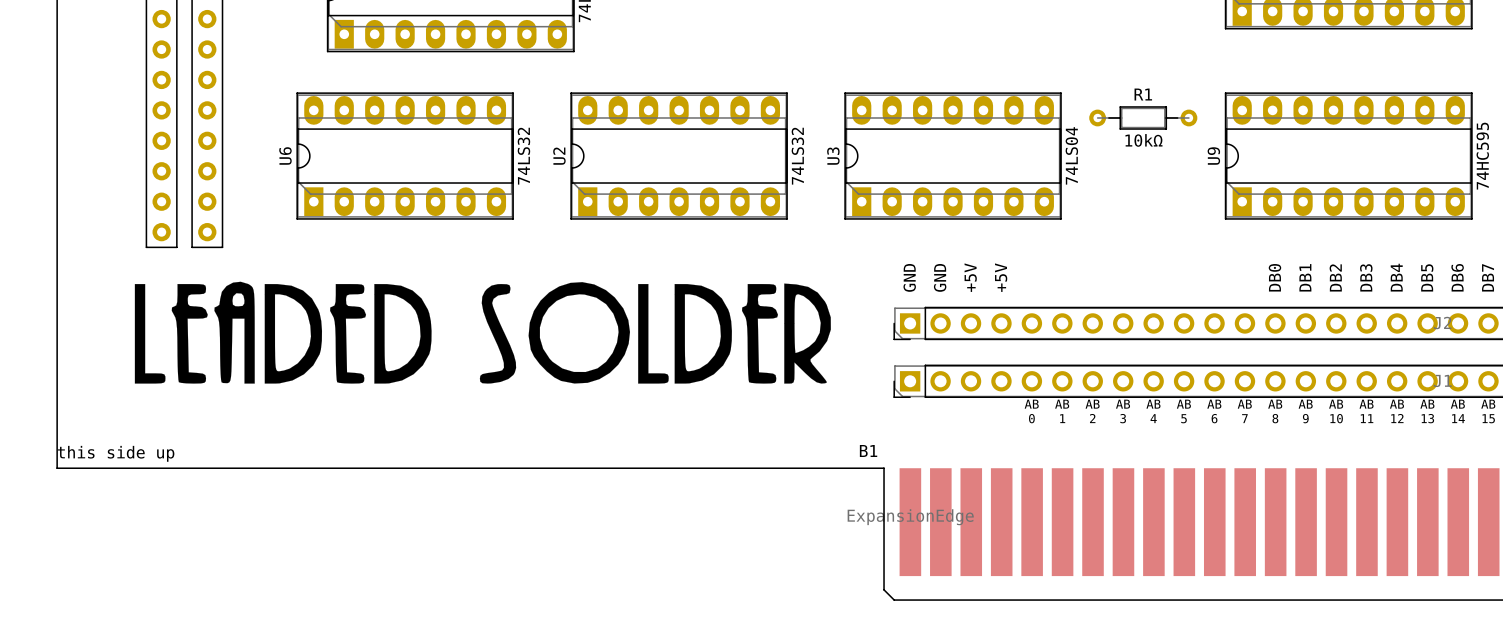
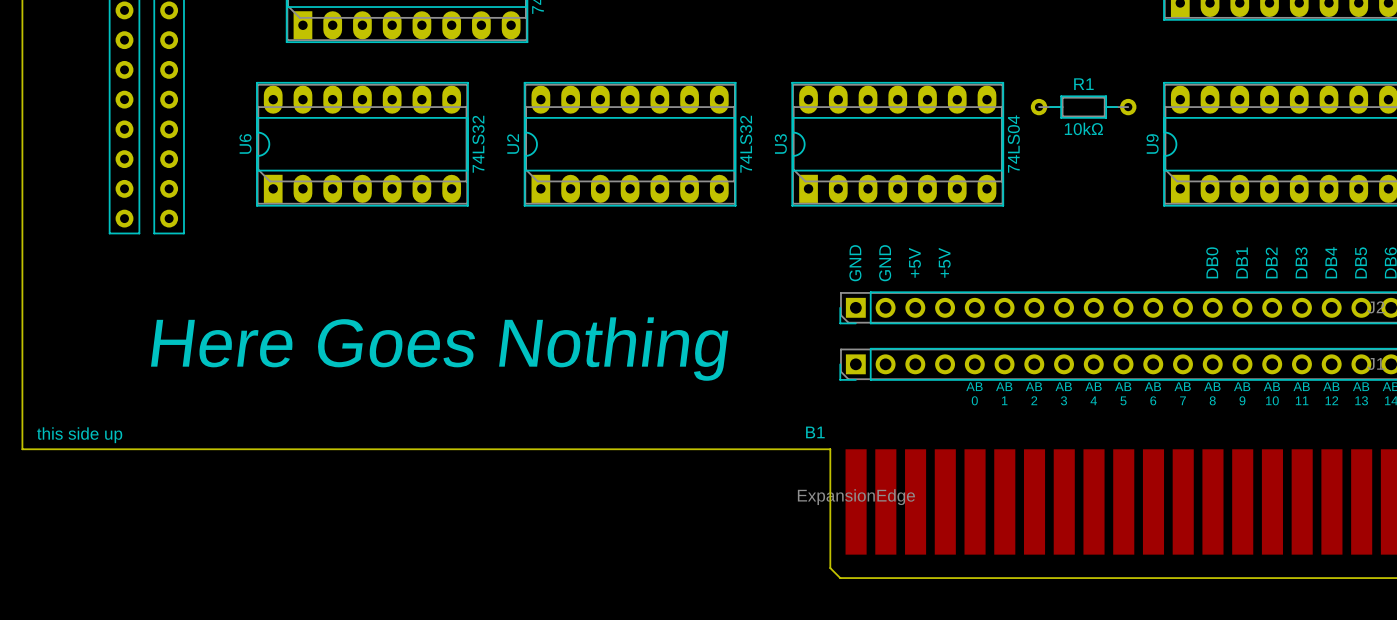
drawing: [134, 281, 831, 384] -> none
text: none -> Here Goes Nothing (439, 349)

